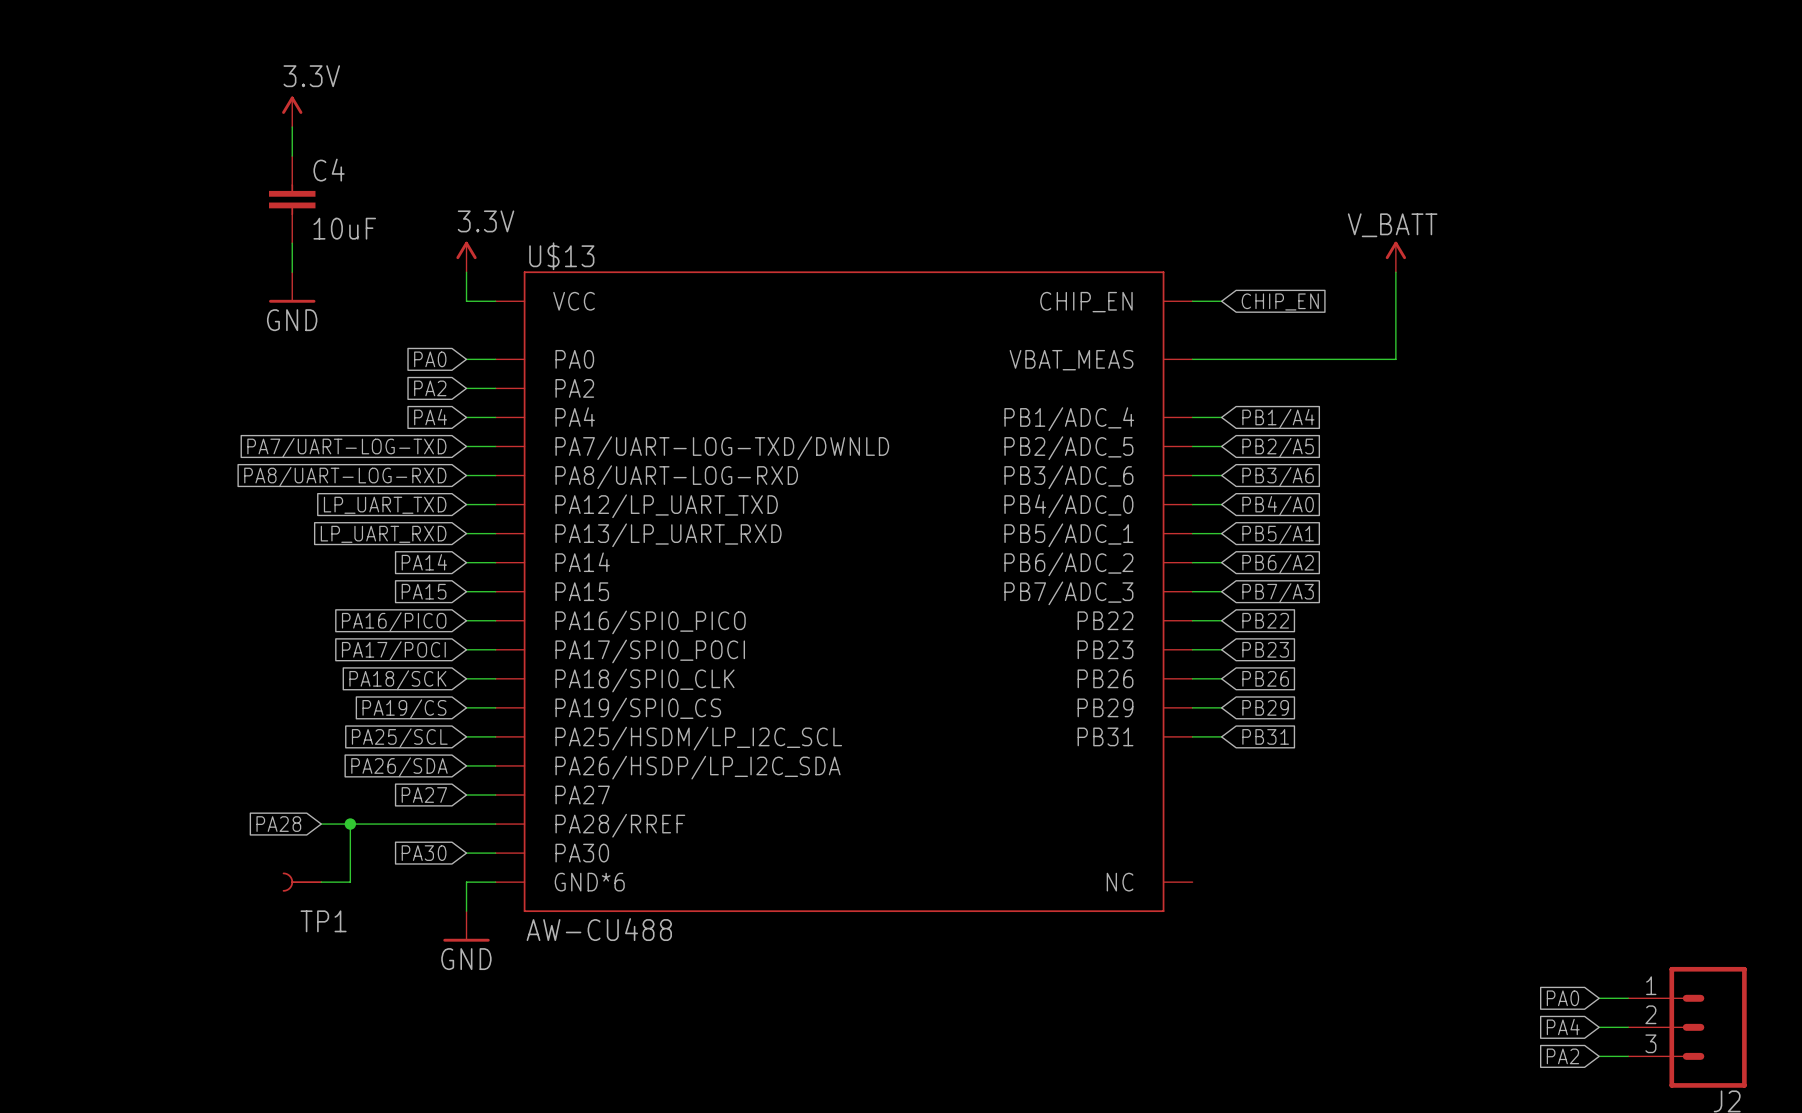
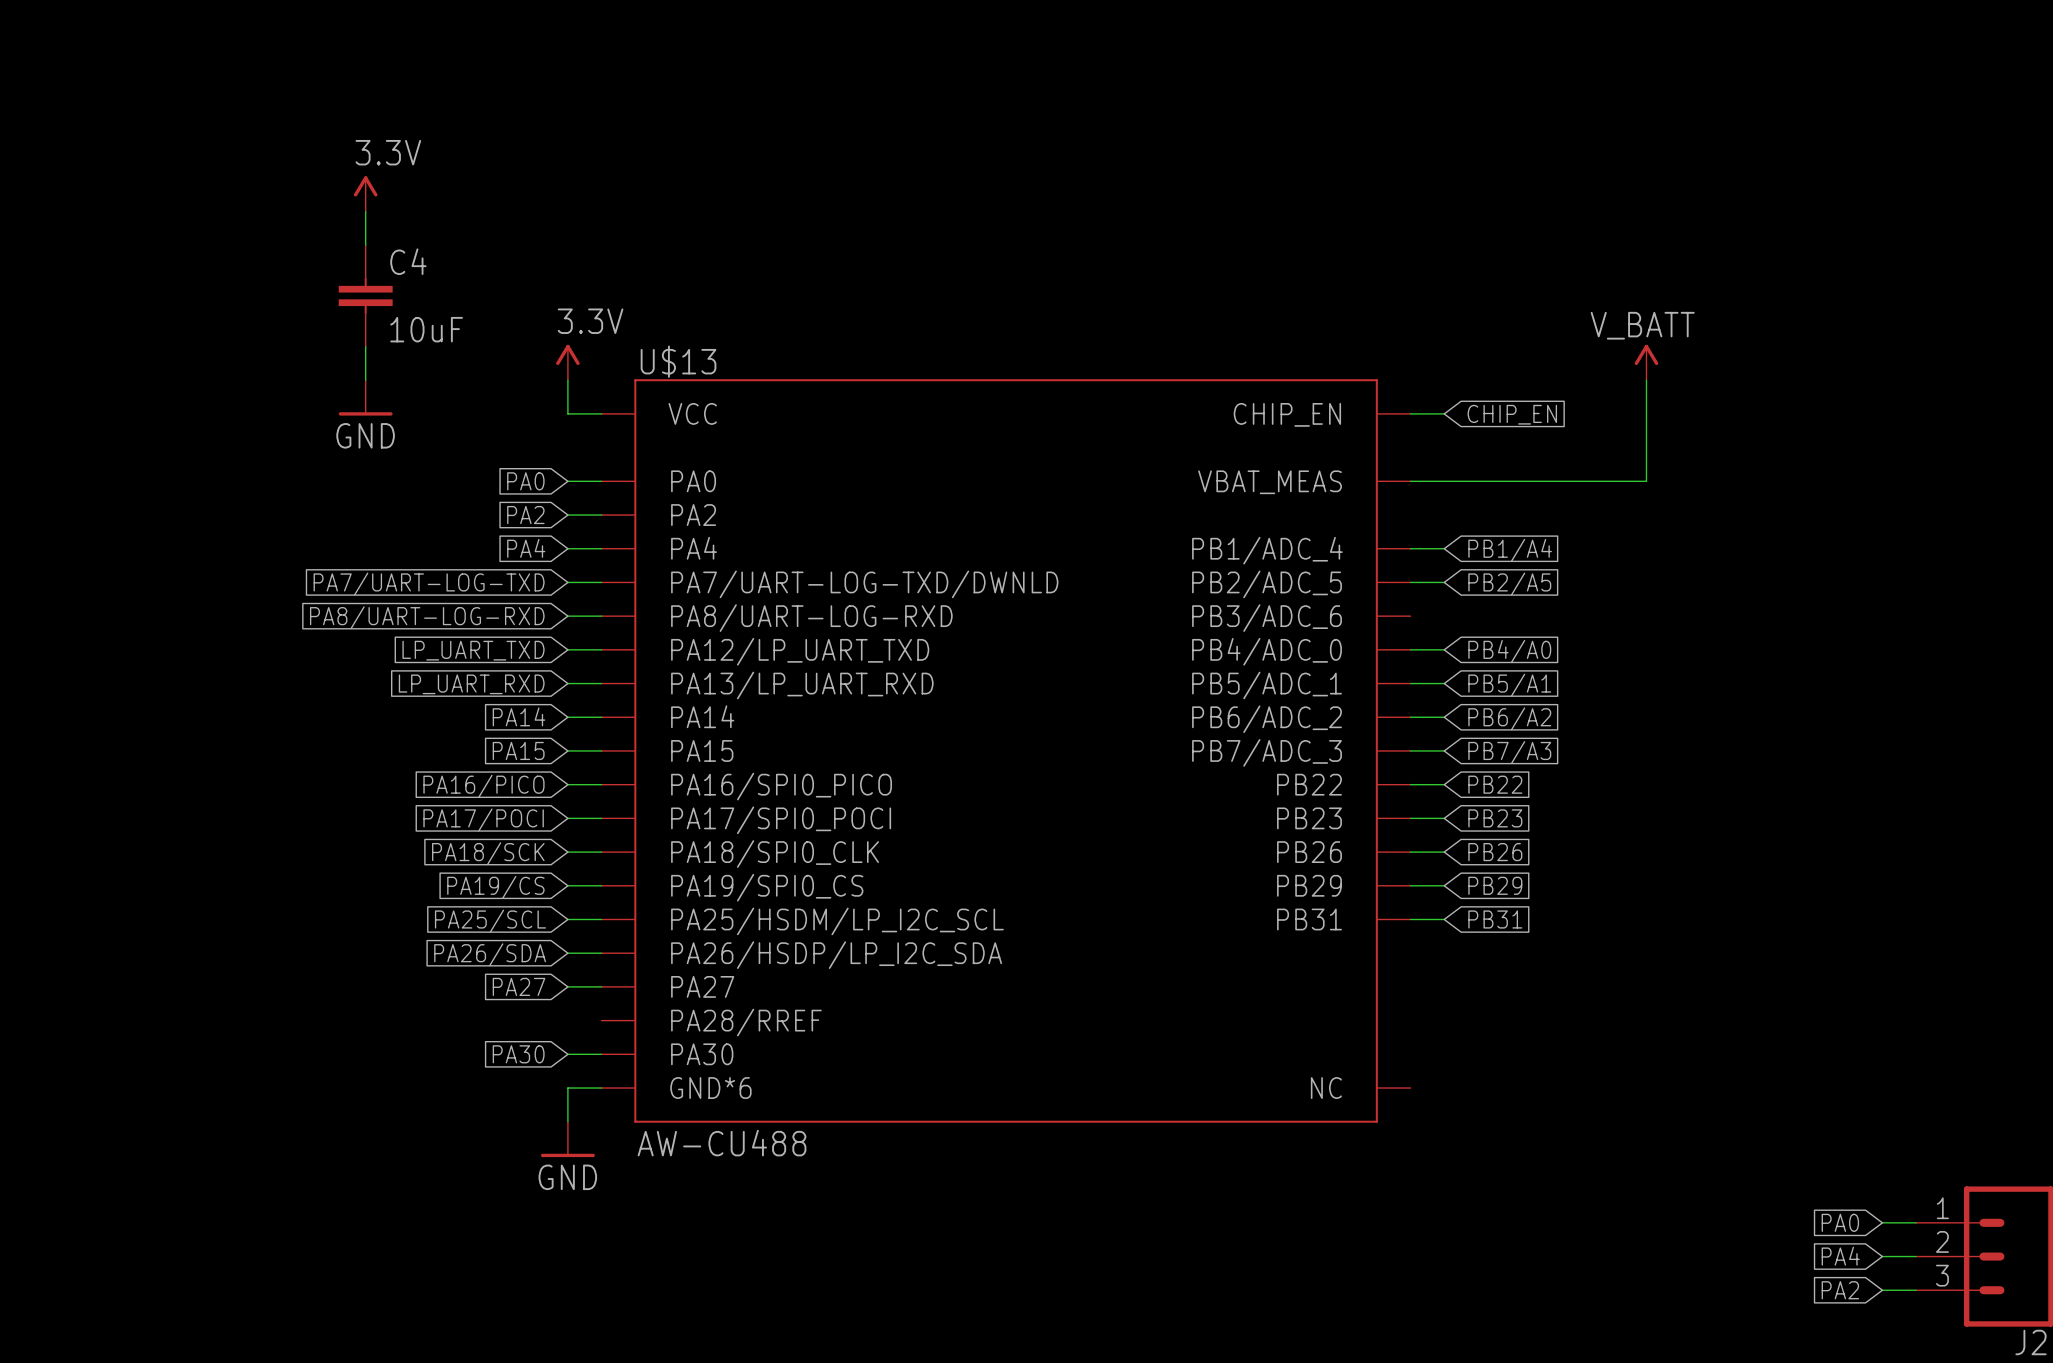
wire: (1192, 475) (1221, 475) -> none
global label: PB3/A6 (1278, 476) -> none
global label: PA28 (278, 824) -> none
wire: (321, 824) (495, 824) -> none
wire: (350, 824) (350, 882) (321, 882) -> none
junction: (350, 824) -> none
TP1: (302, 882) -> none

